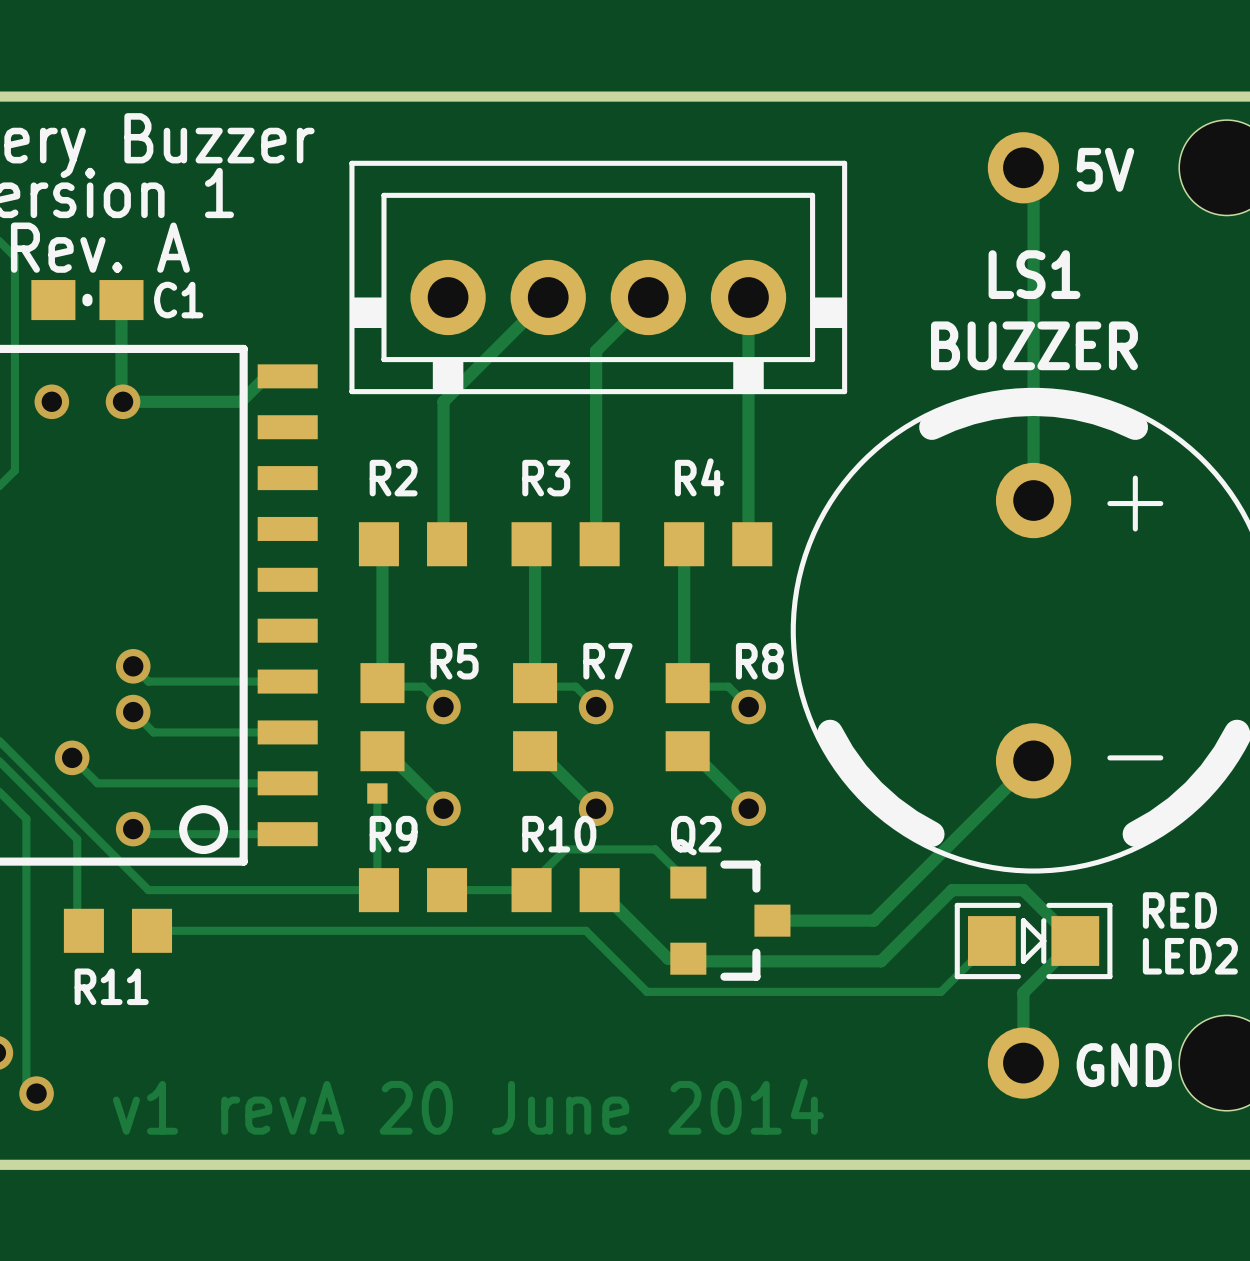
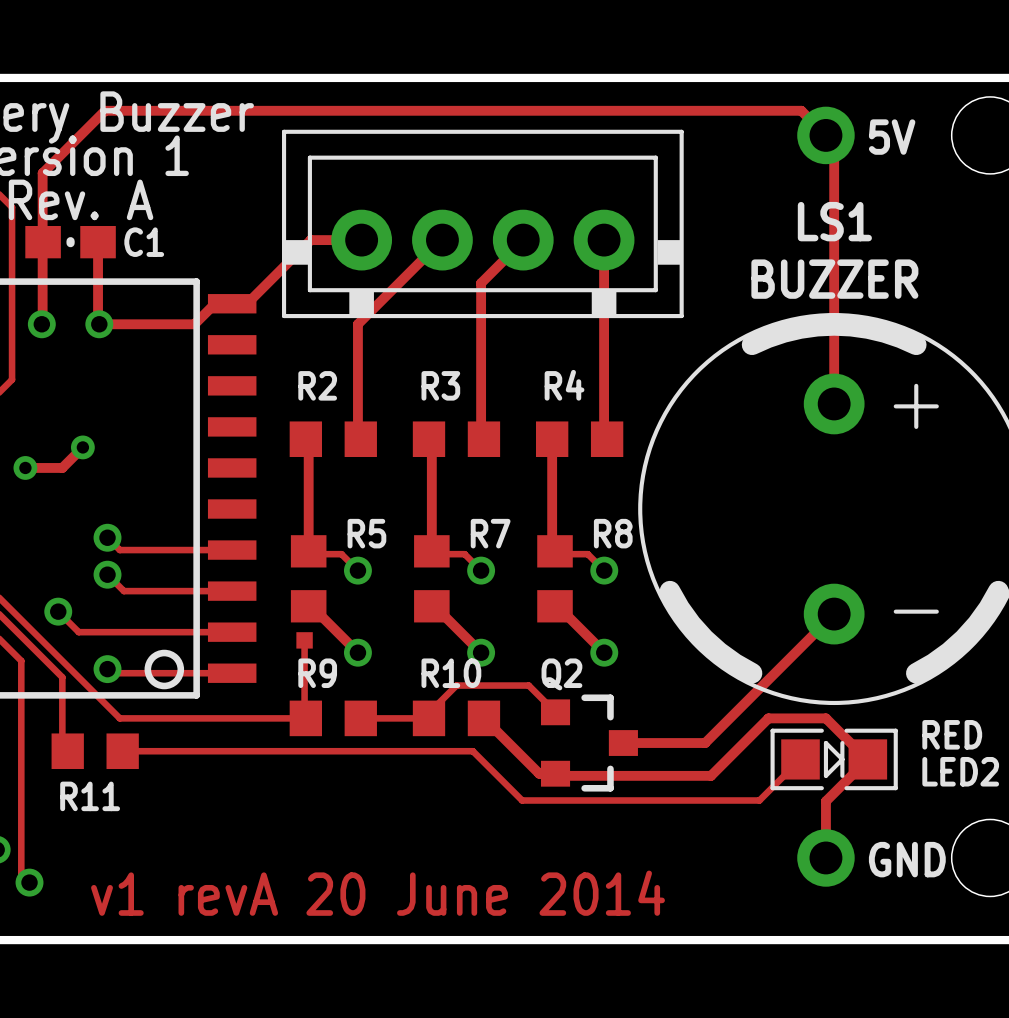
track: none -> (825, 135) (801, 110) (105, 110) (42, 173) (42, 323)
track: none -> (361, 240) (310, 240) (247, 303)
track: none -> (82, 447) (62, 467) (25, 467)
via: none -> (82, 447)
via: none -> (25, 467)

